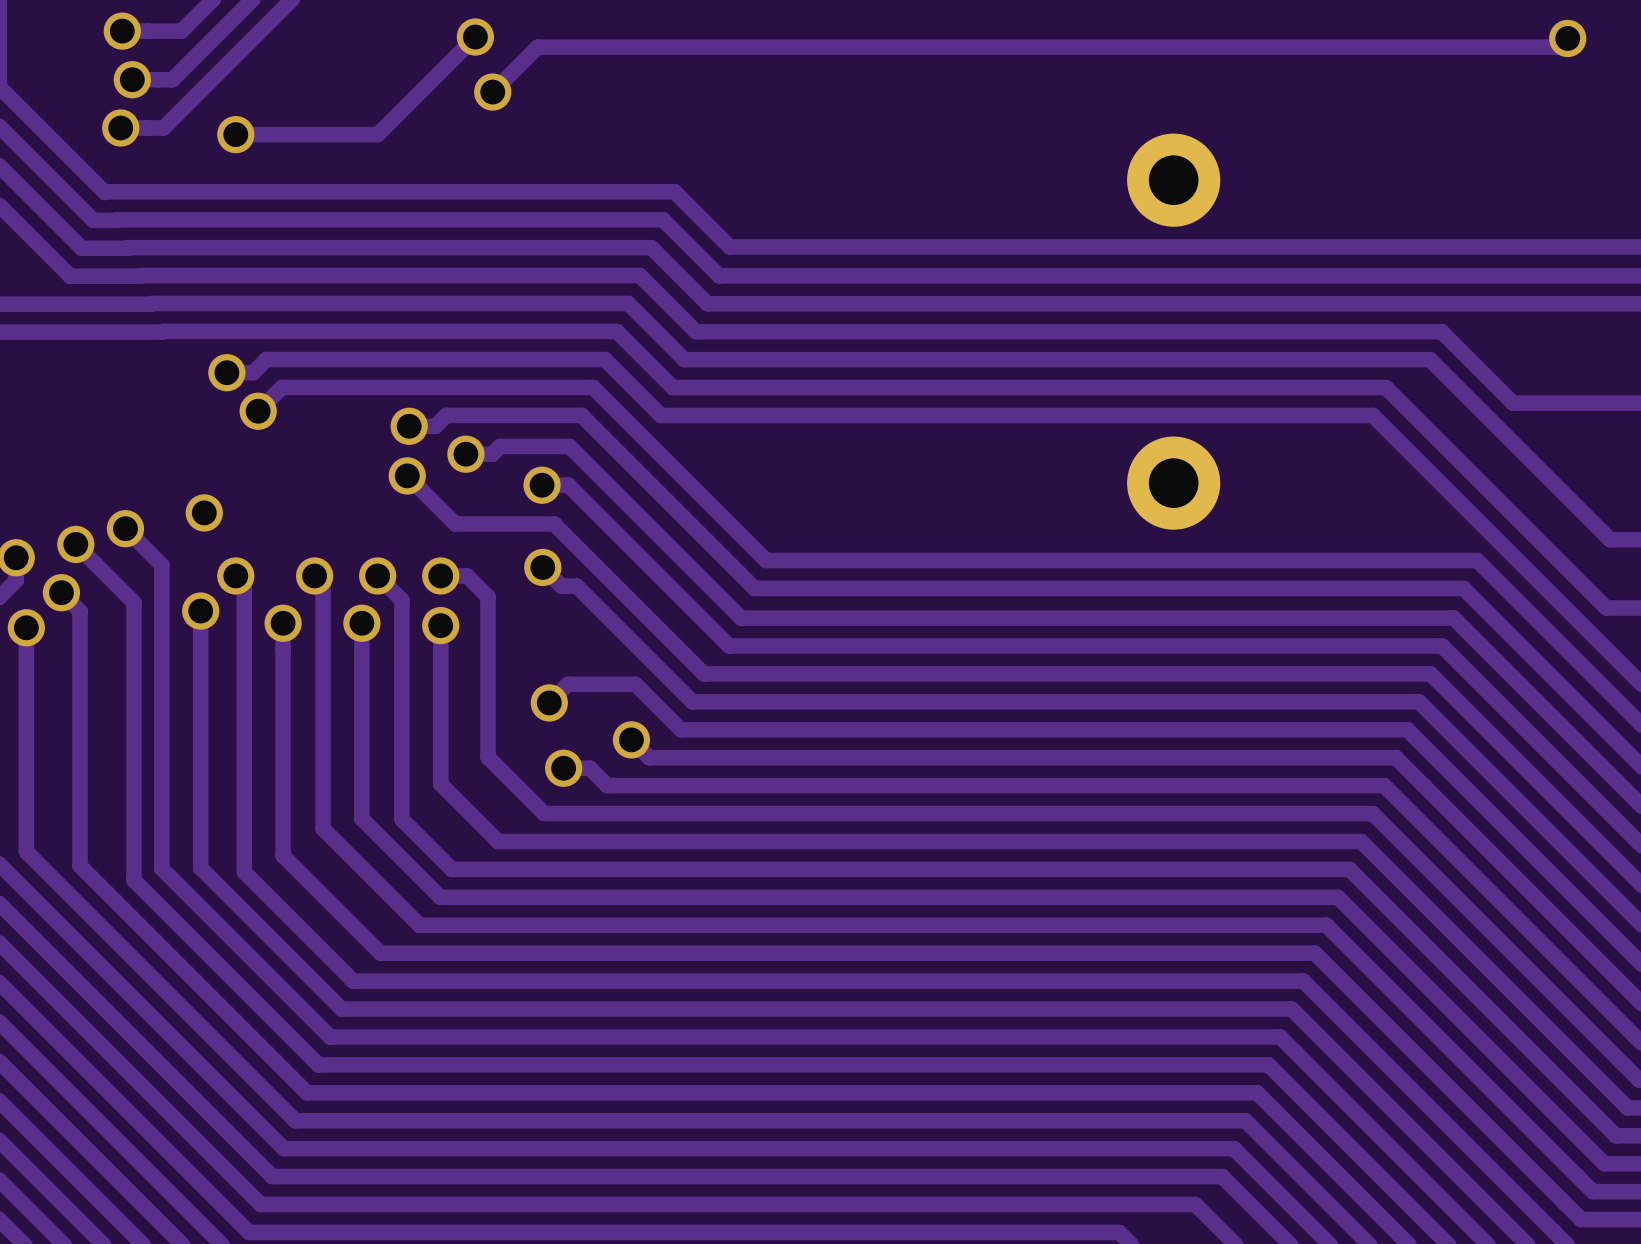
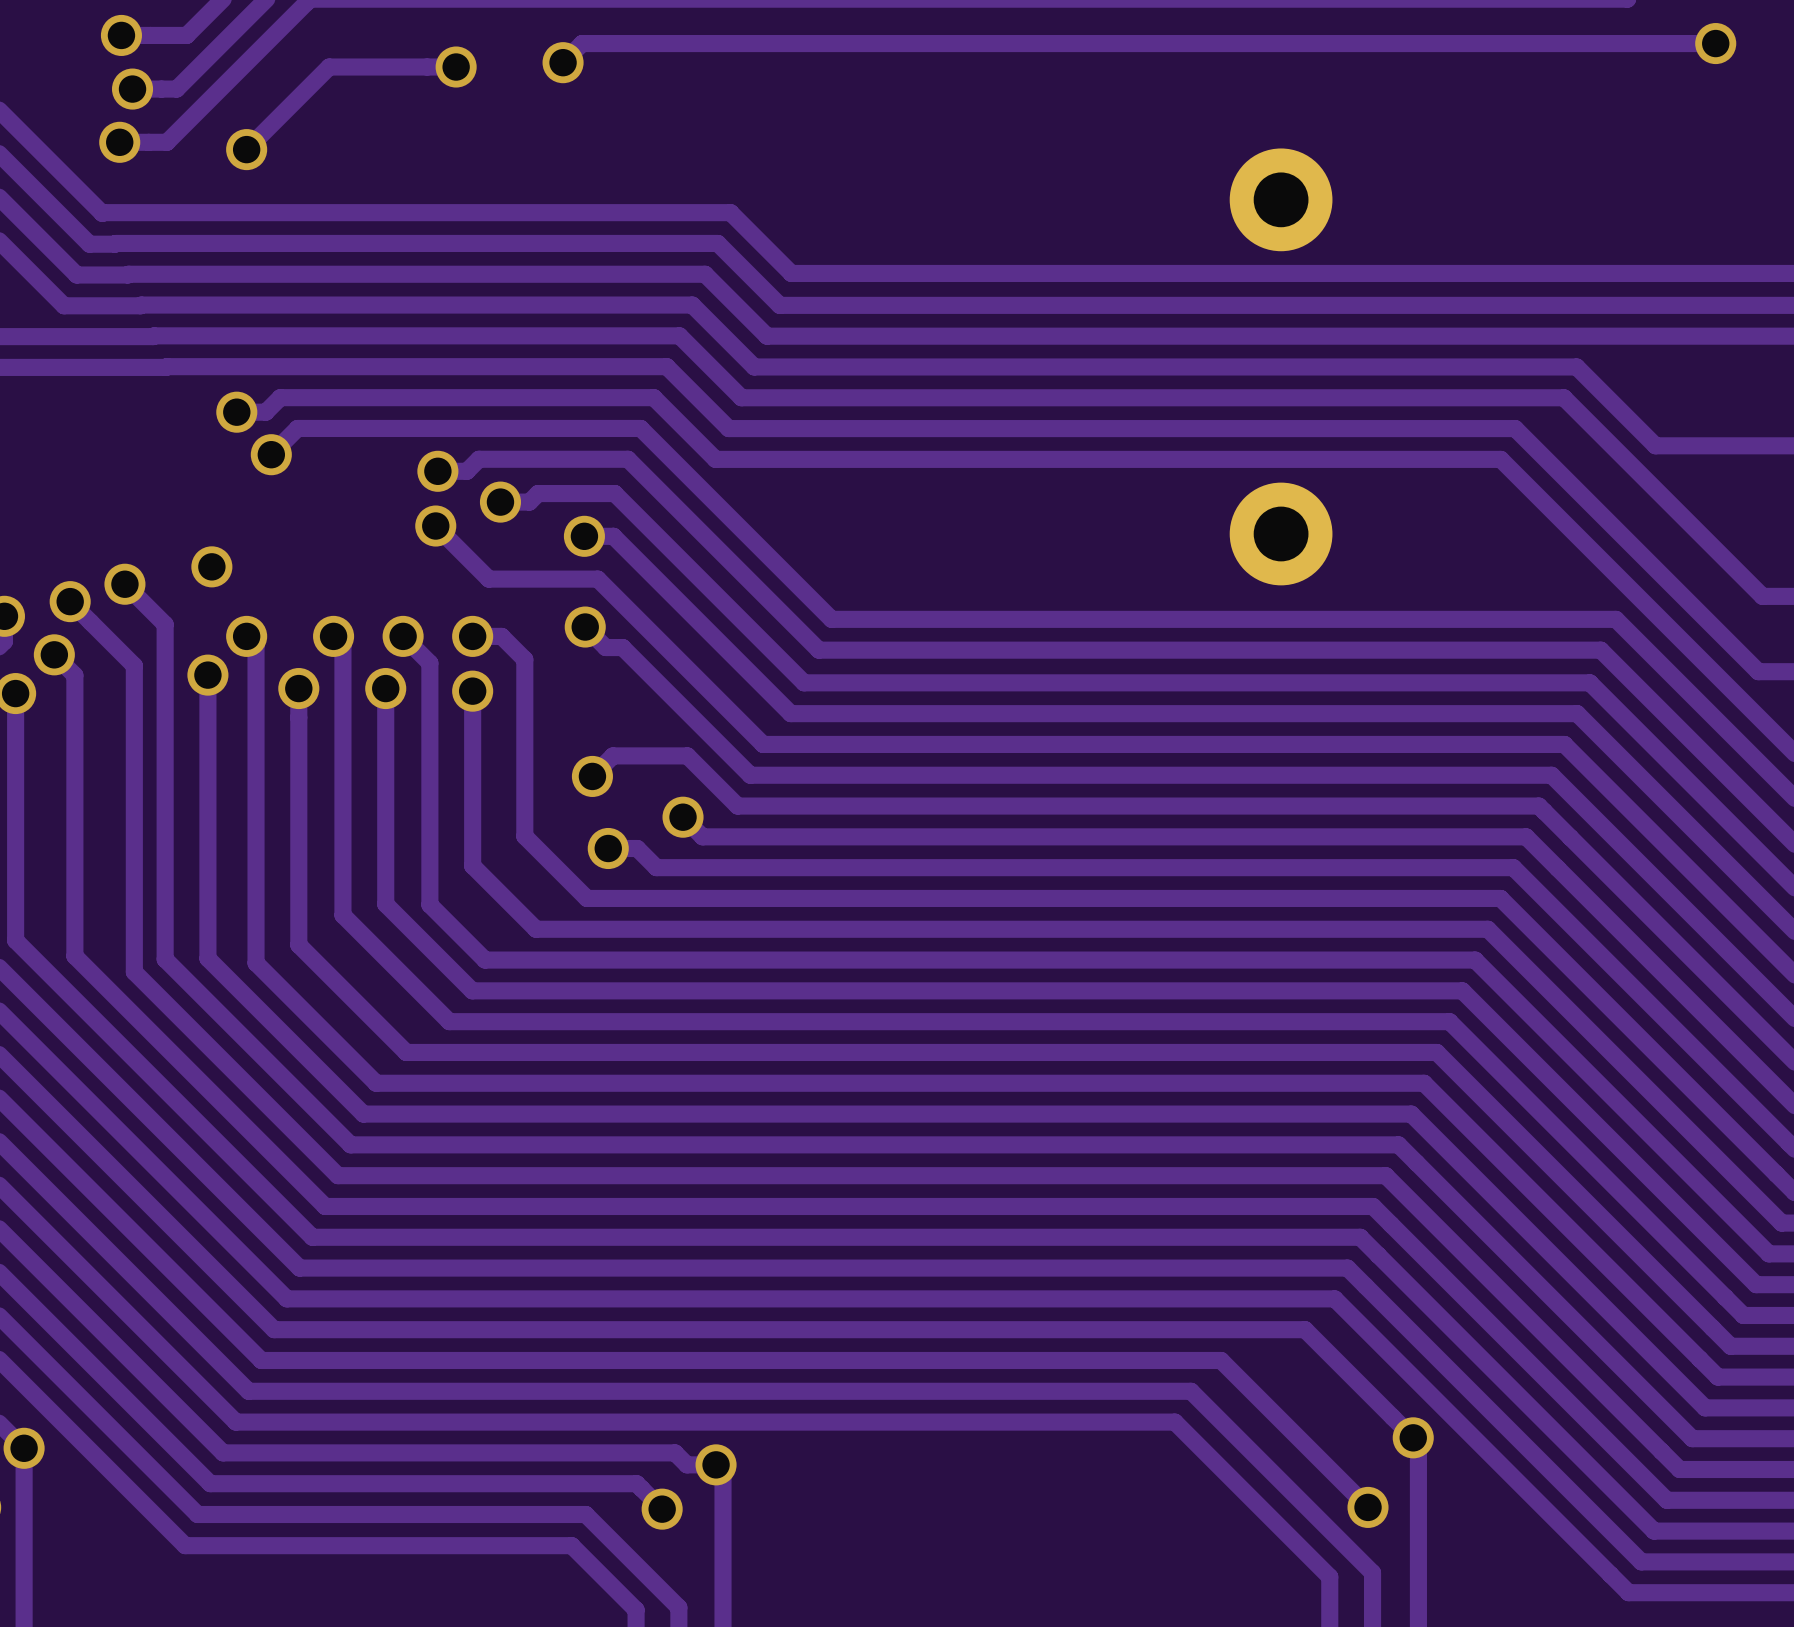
track: (475, 37) (377, 134) (235, 134) -> (456, 67) (329, 67) (246, 149)
via: (475, 37) -> none
track: (1567, 38) (1559, 47) (537, 47) (492, 92) -> (1715, 43) (582, 43) (563, 62)
via: none -> (456, 67)
via position: (492, 92) -> (563, 62)

